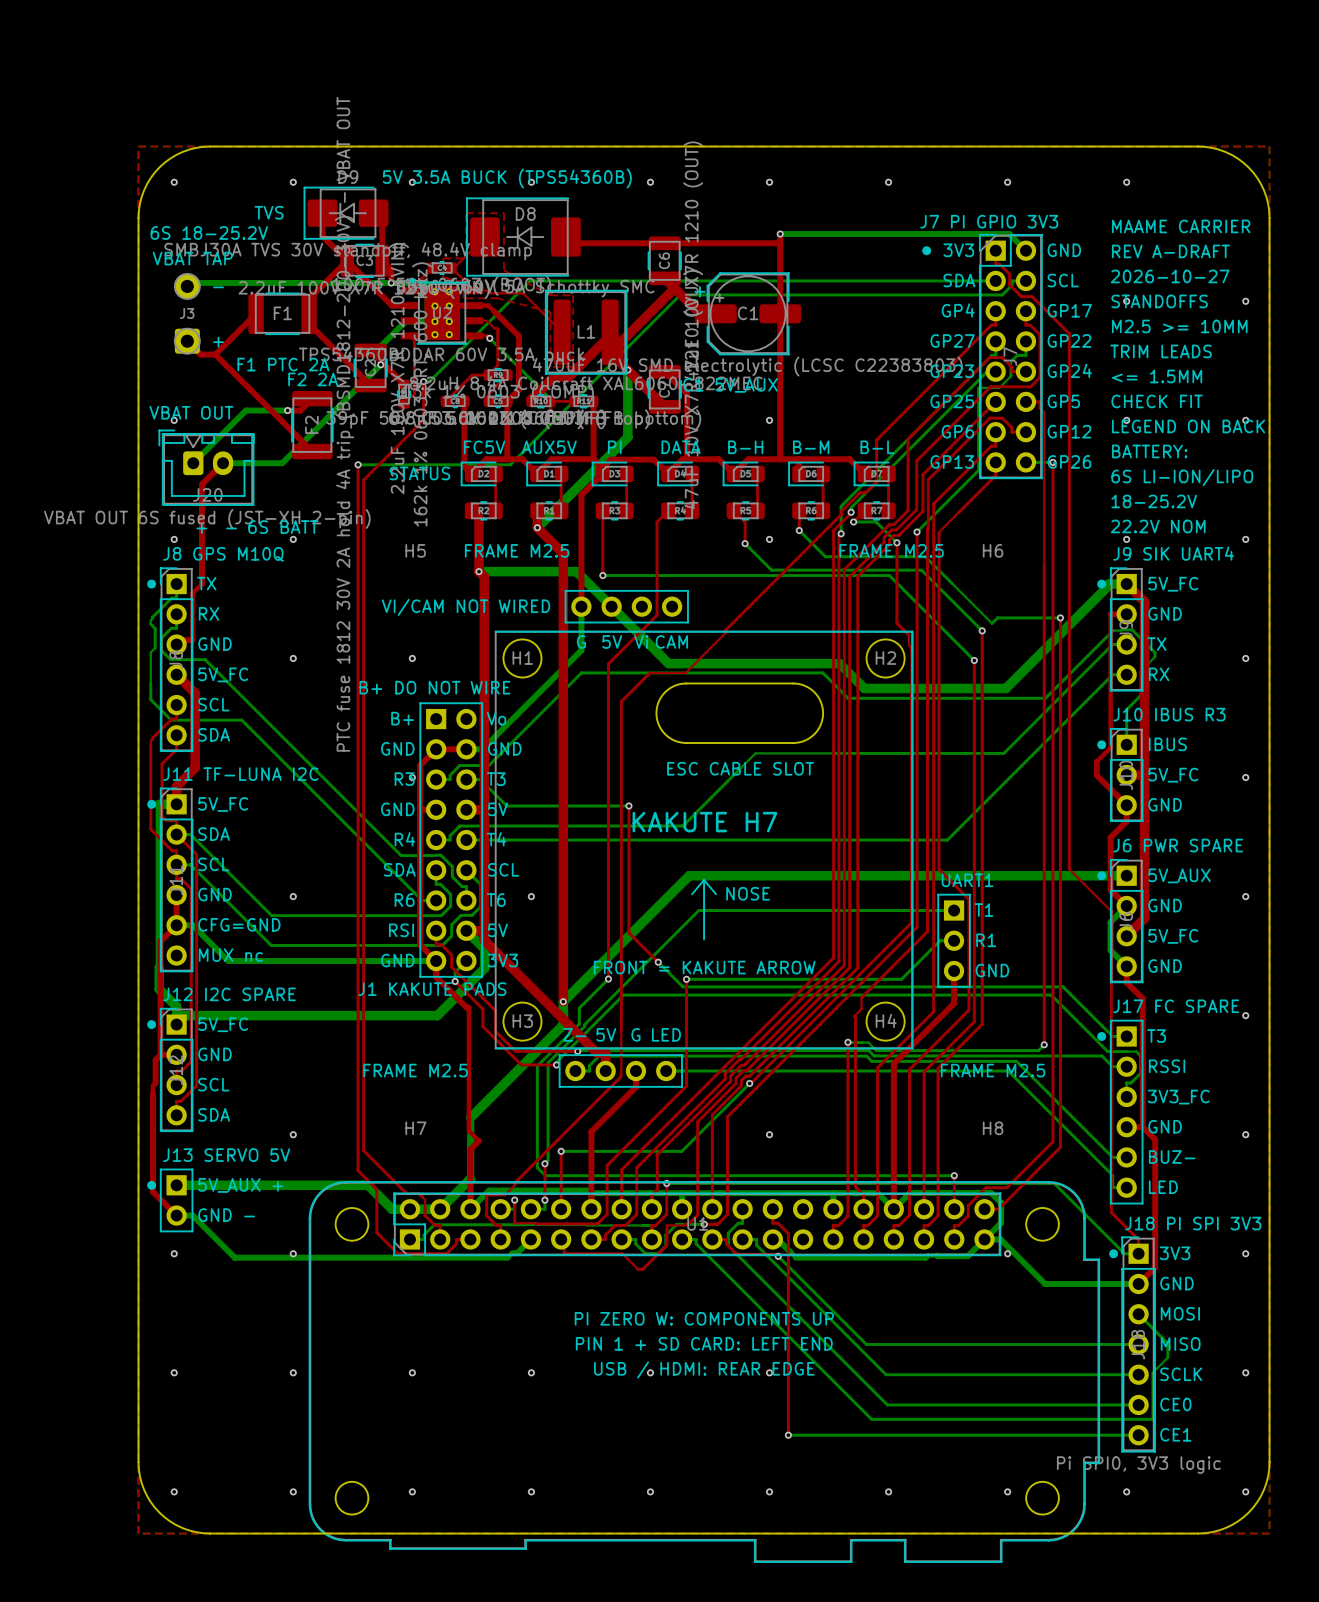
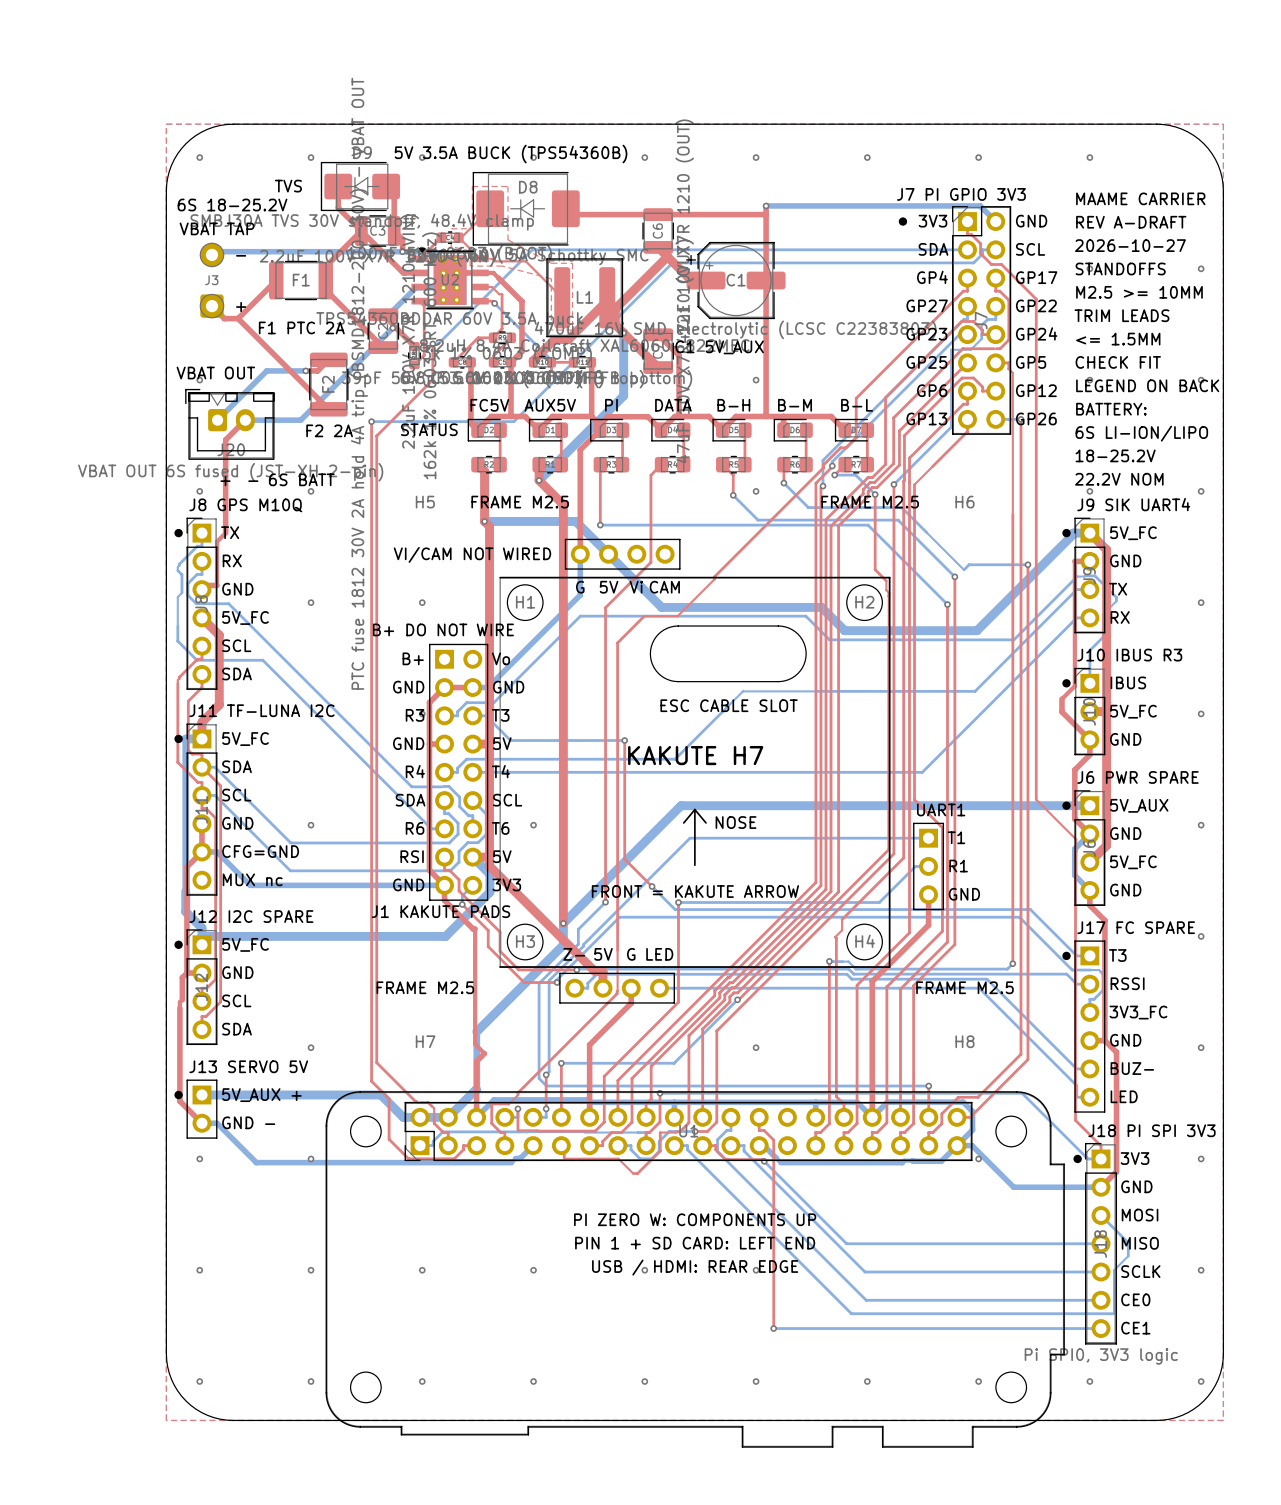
text position: F2 2A (313, 379) -> F2 2A (329, 430)

